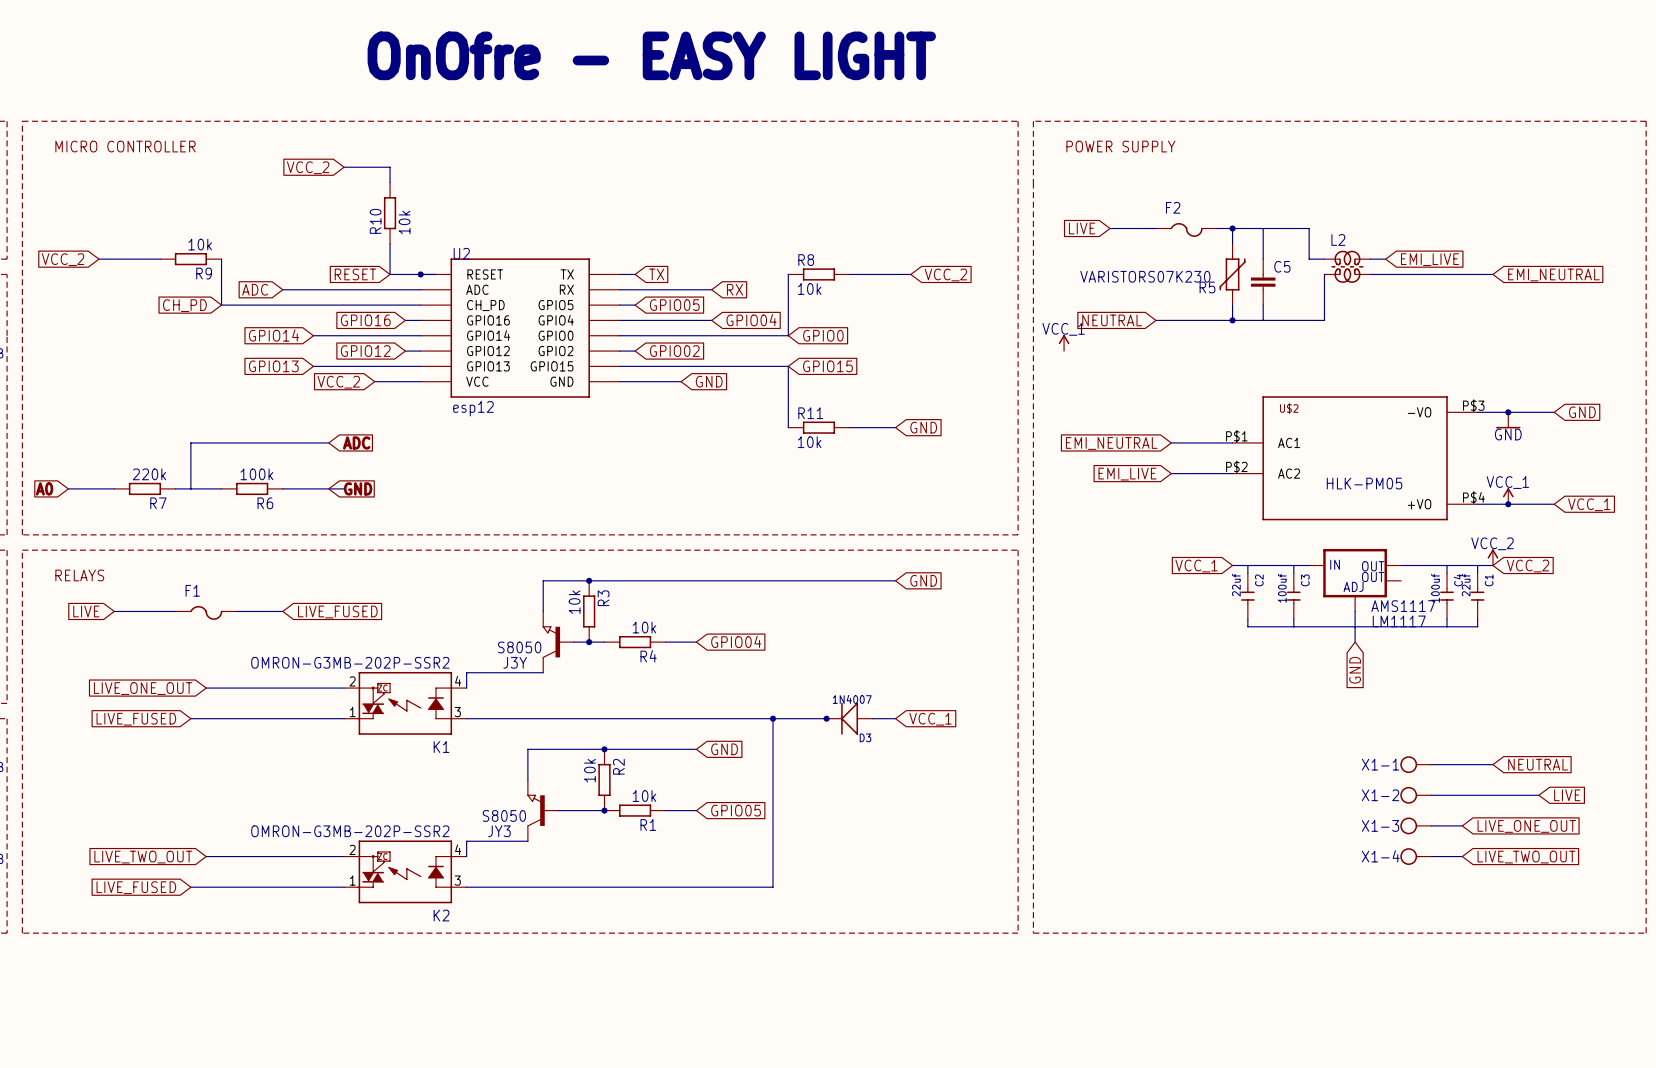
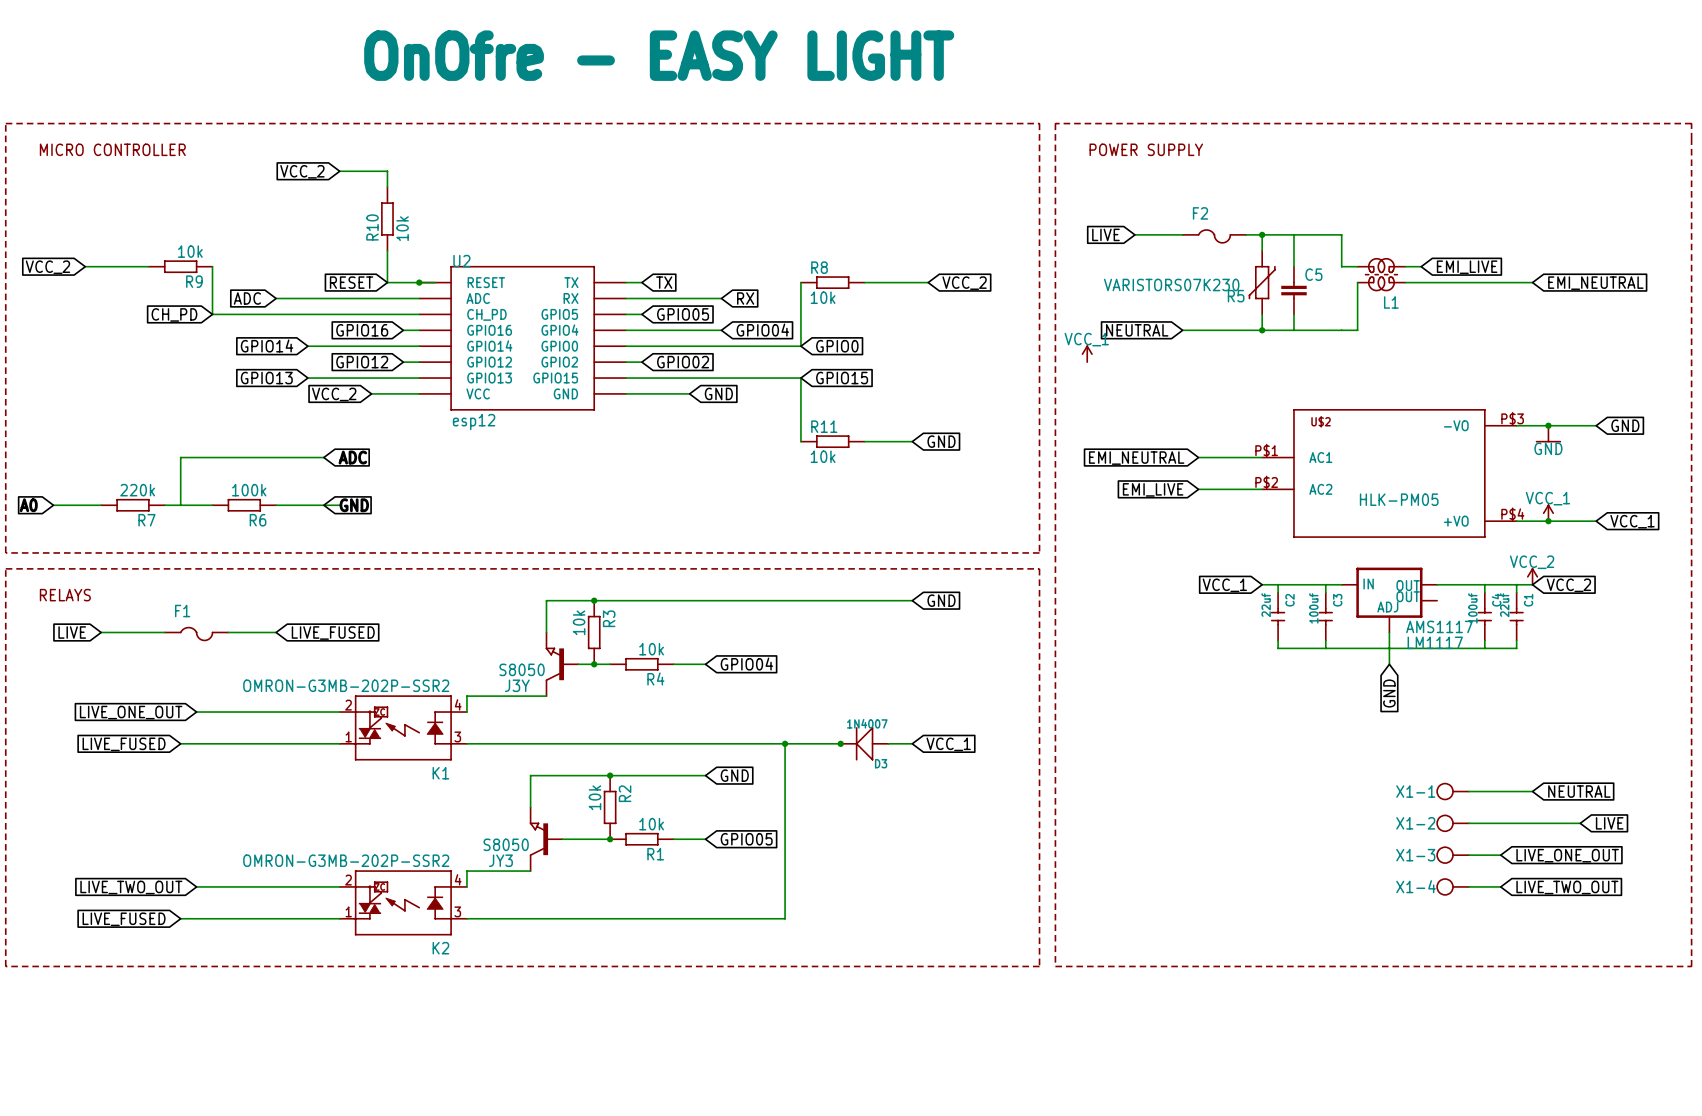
L2: (1347, 266) -> none
L1: none -> (1381, 274)

